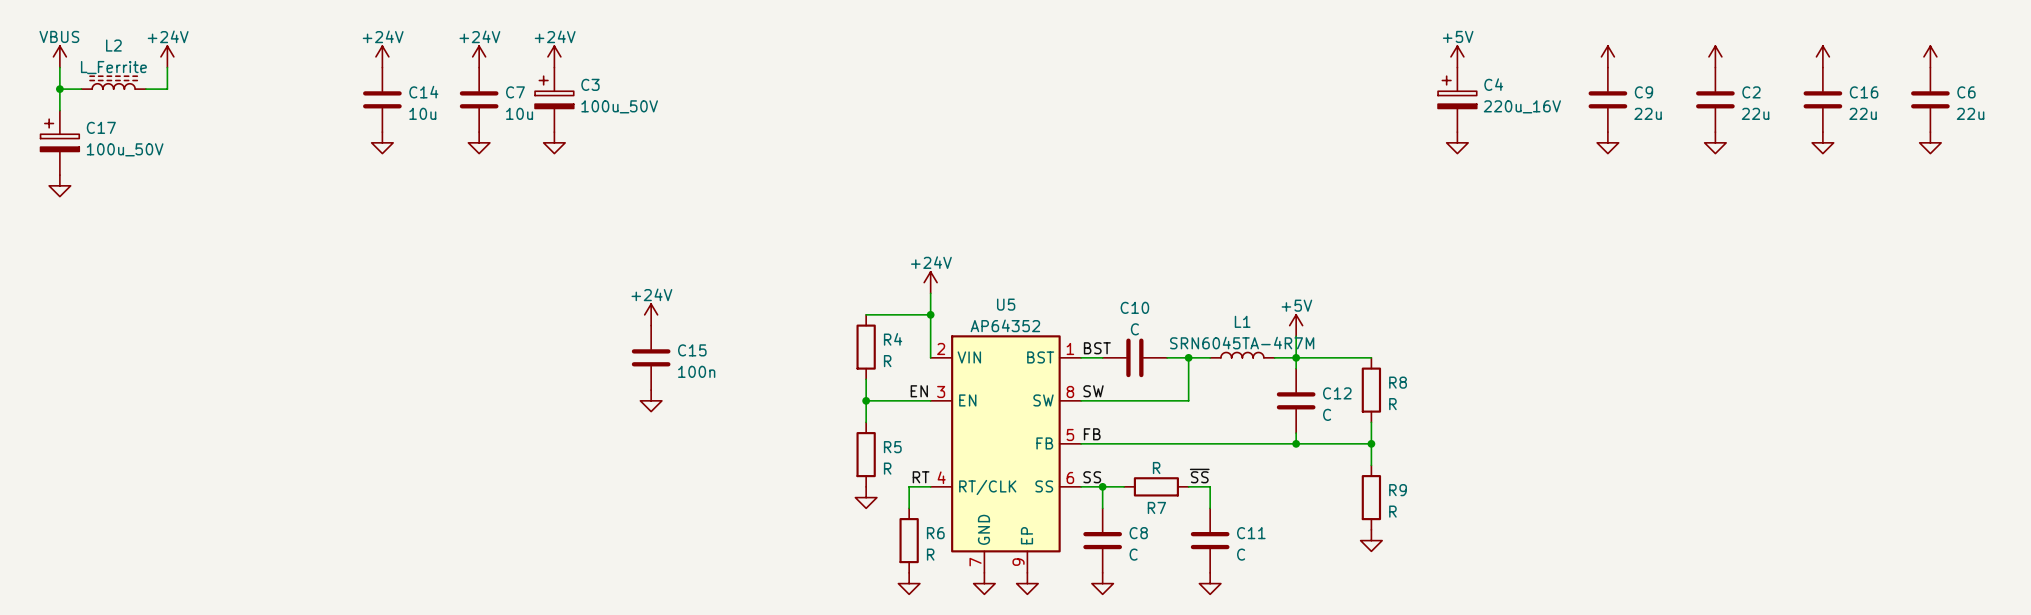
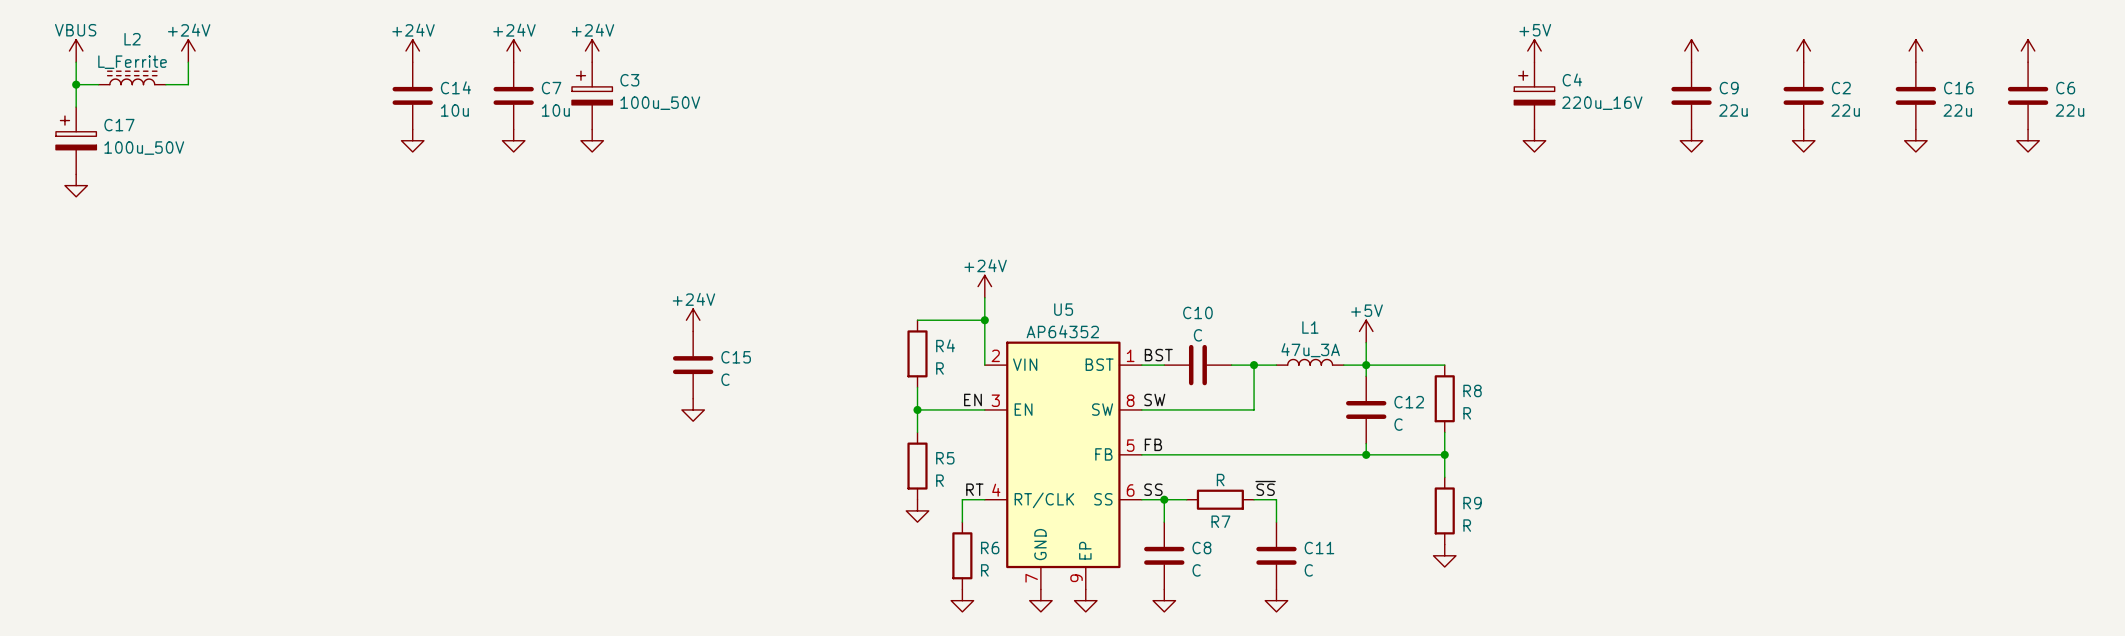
L1 value: SRN6045TA-4R7M (1242, 343) -> 47u_3A (1310, 350)
C15 value: 100n (696, 371) -> C (725, 379)

